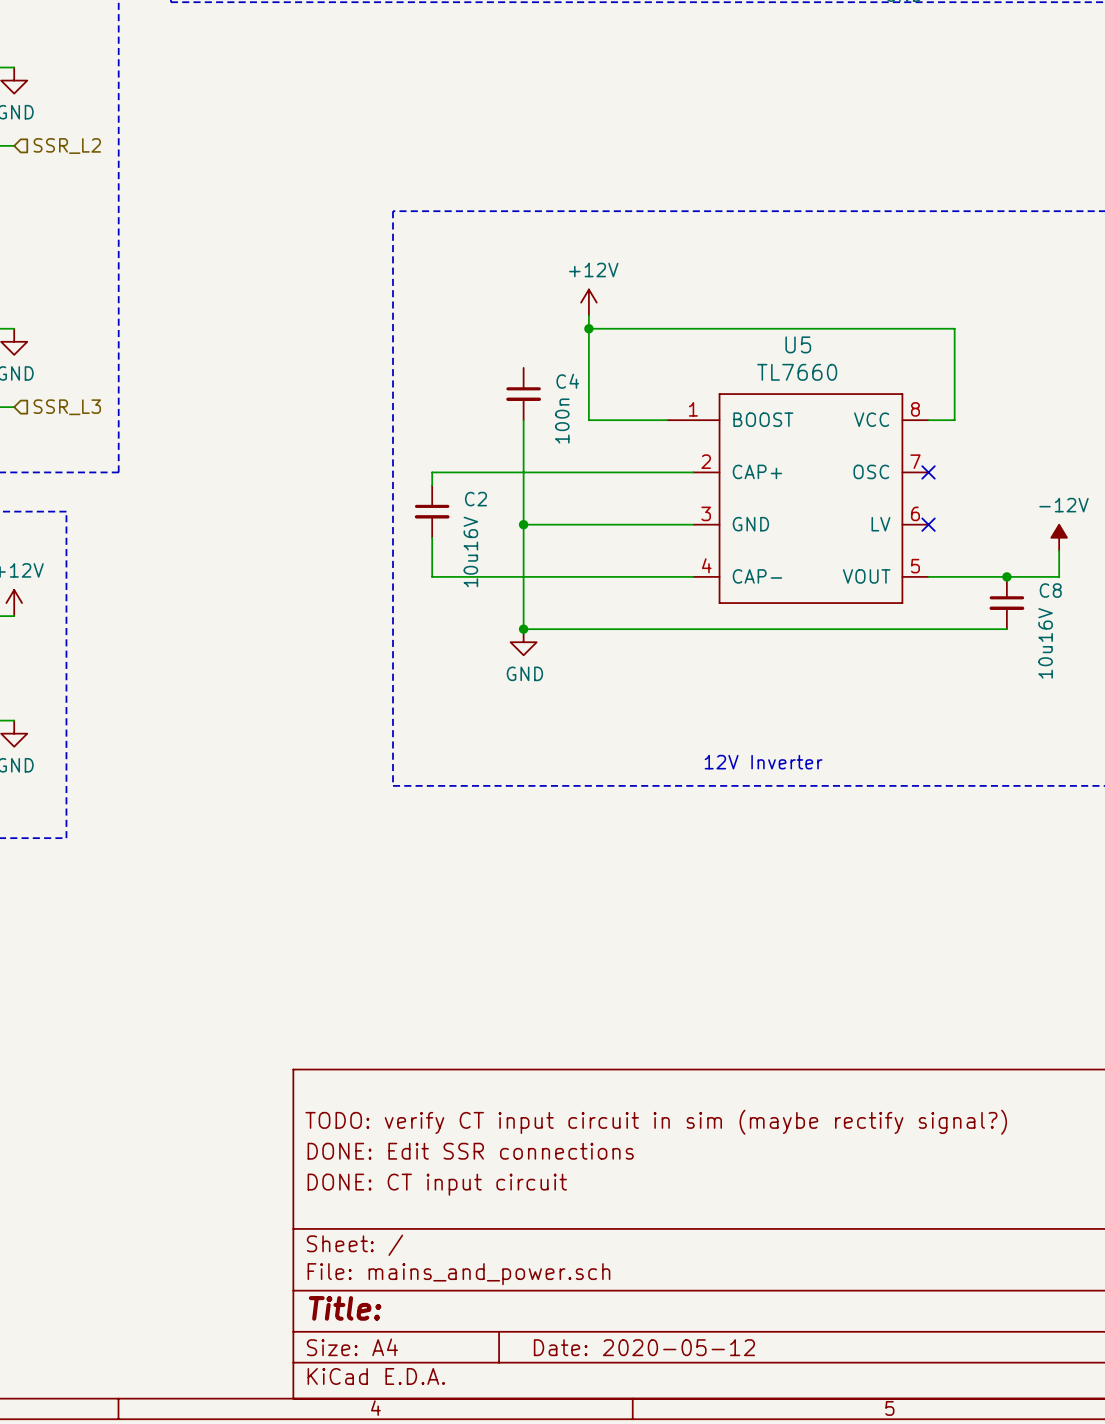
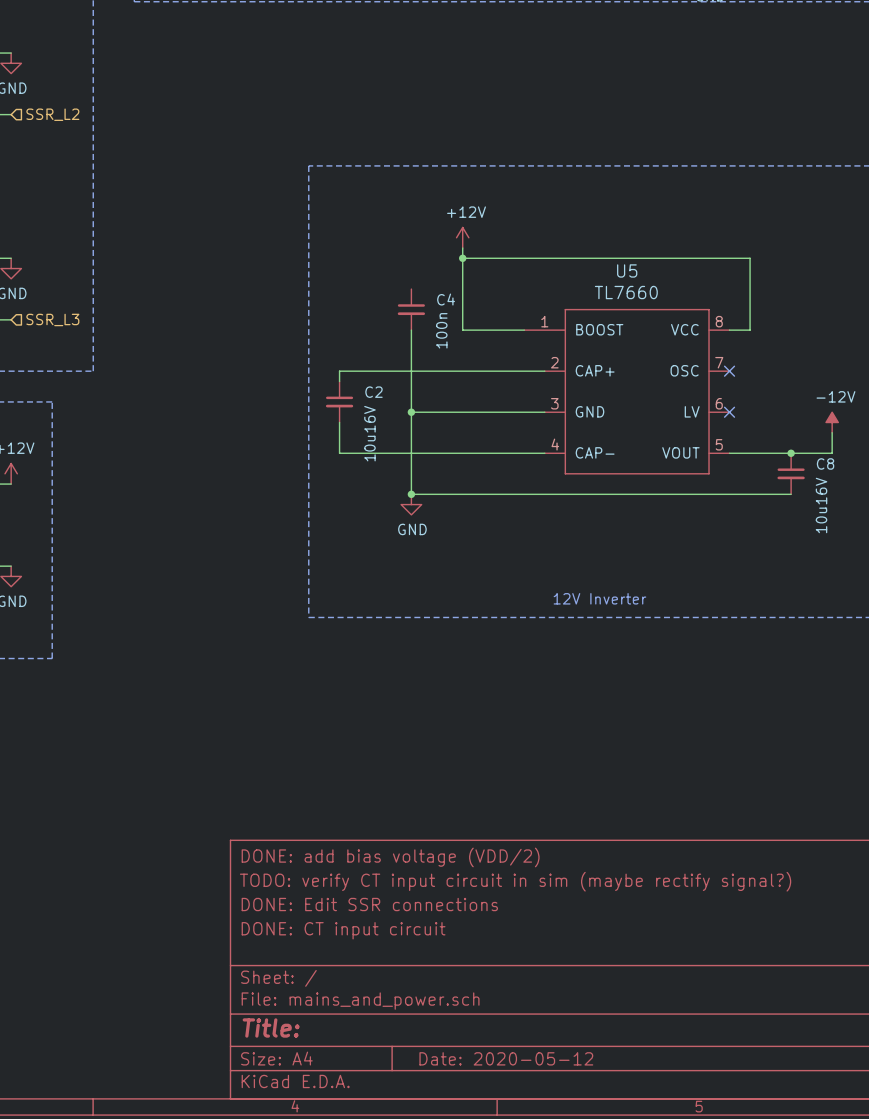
title block: none -> DONE: add bias voltage (VDD/2) (390, 857)

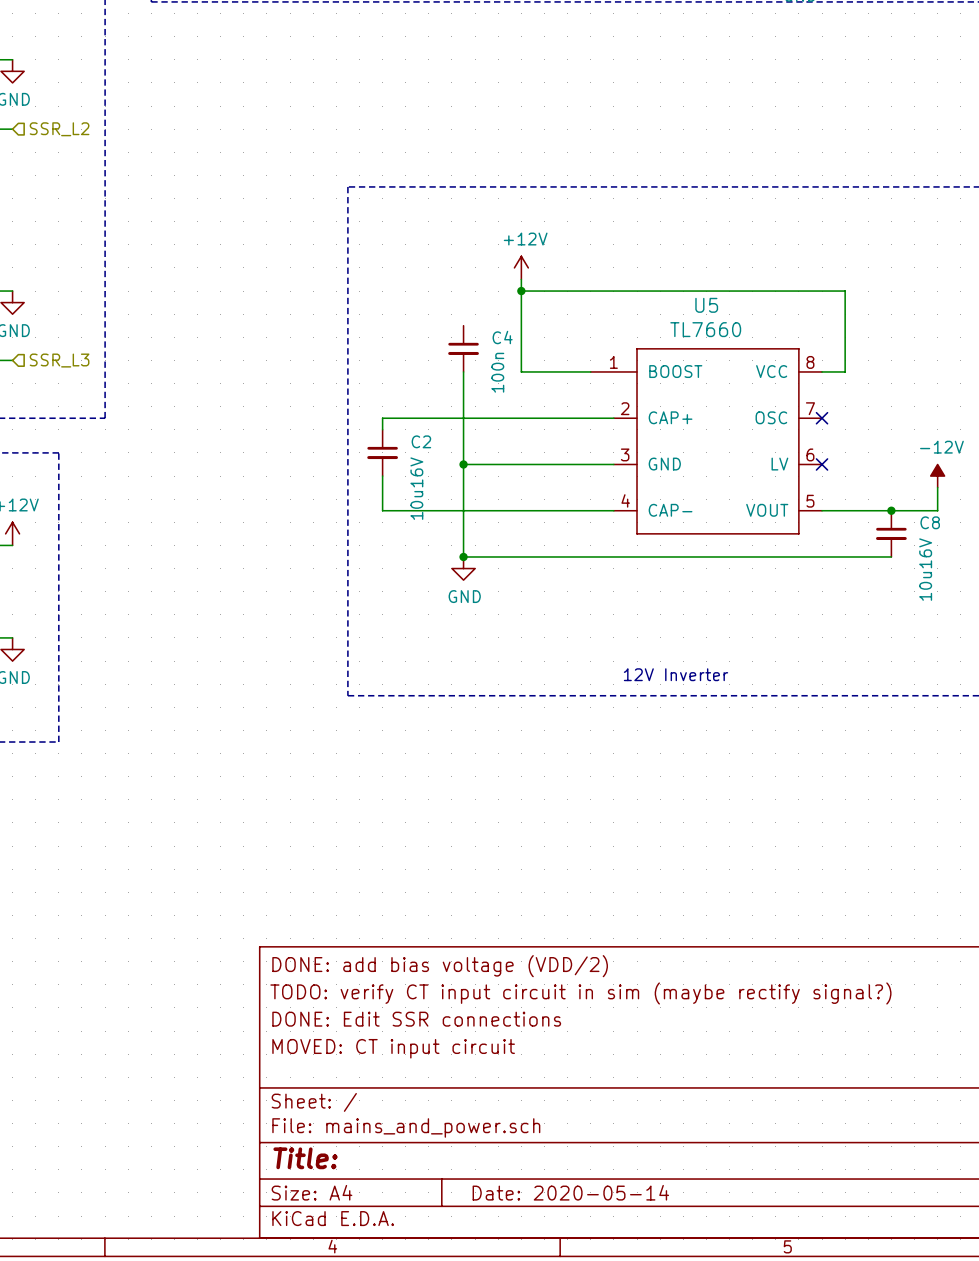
title block: DONE: CT input circuit (343, 930) -> MOVED: CT input circuit (393, 1048)
title block: Date: 2020-05-12 (506, 1058) -> Date: 2020-05-14 (570, 1192)

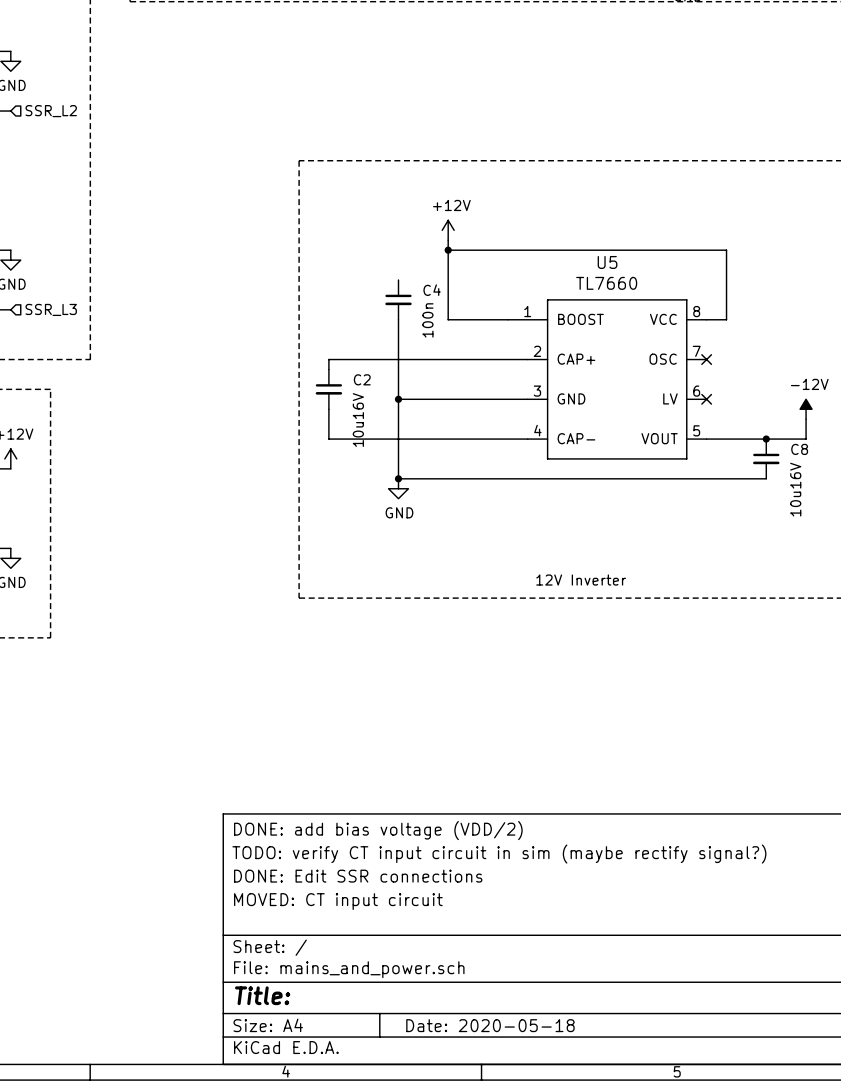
title block: Date: 2020-05-14 (570, 1192) -> Date: 2020-05-18 (490, 1025)

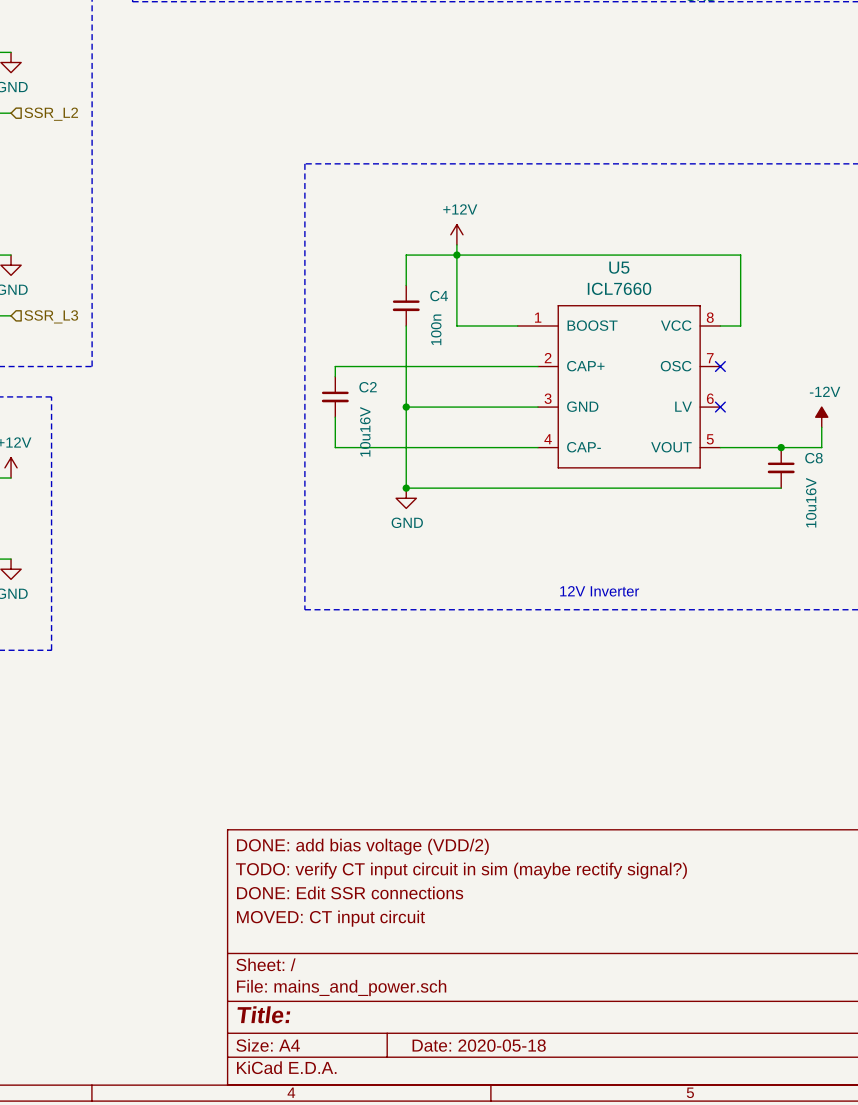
wire: none -> (456, 255) (406, 255) (406, 285)
U5 value: TL7660 (606, 283) -> ICL7660 (619, 288)

